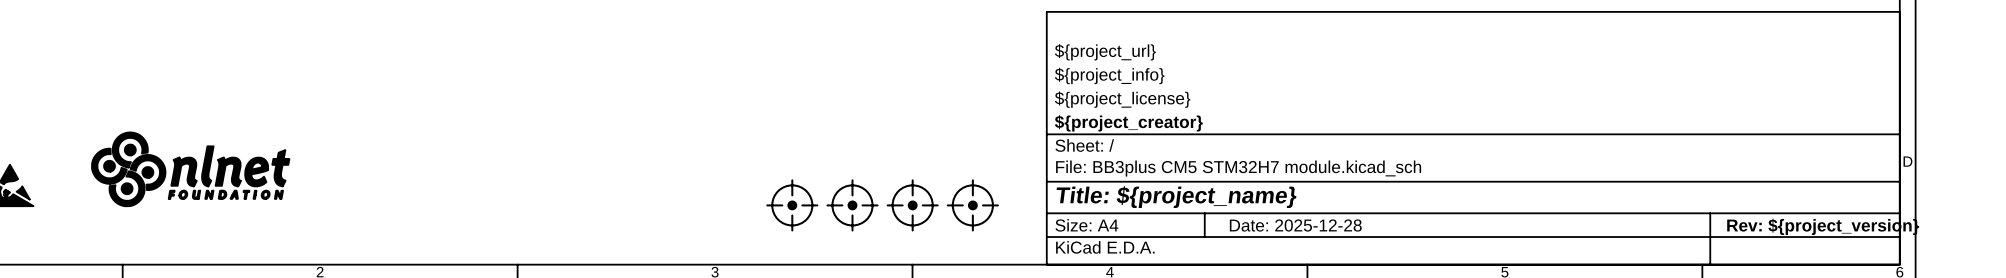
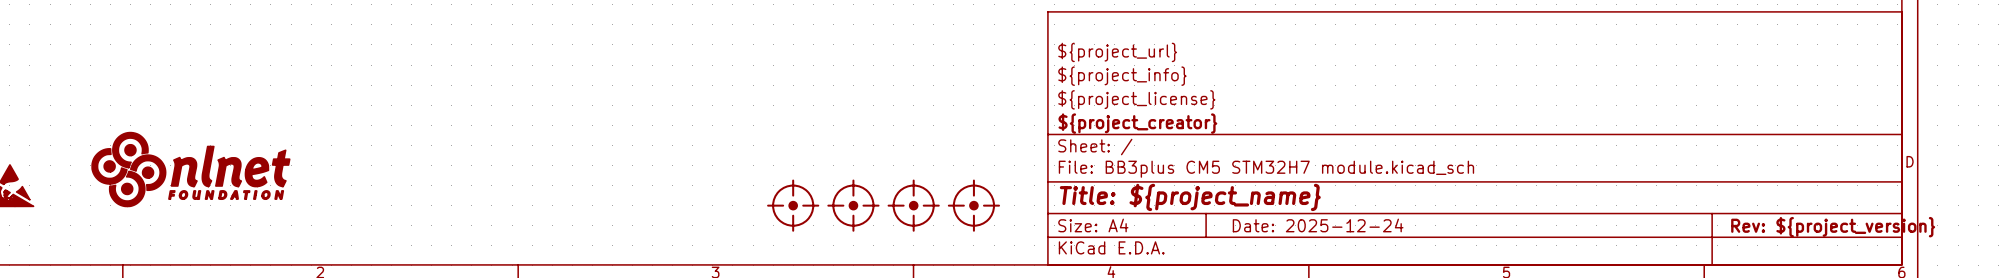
title block: Date: 2025-12-28 (1295, 225) -> Date: 2025-12-24 (1318, 225)

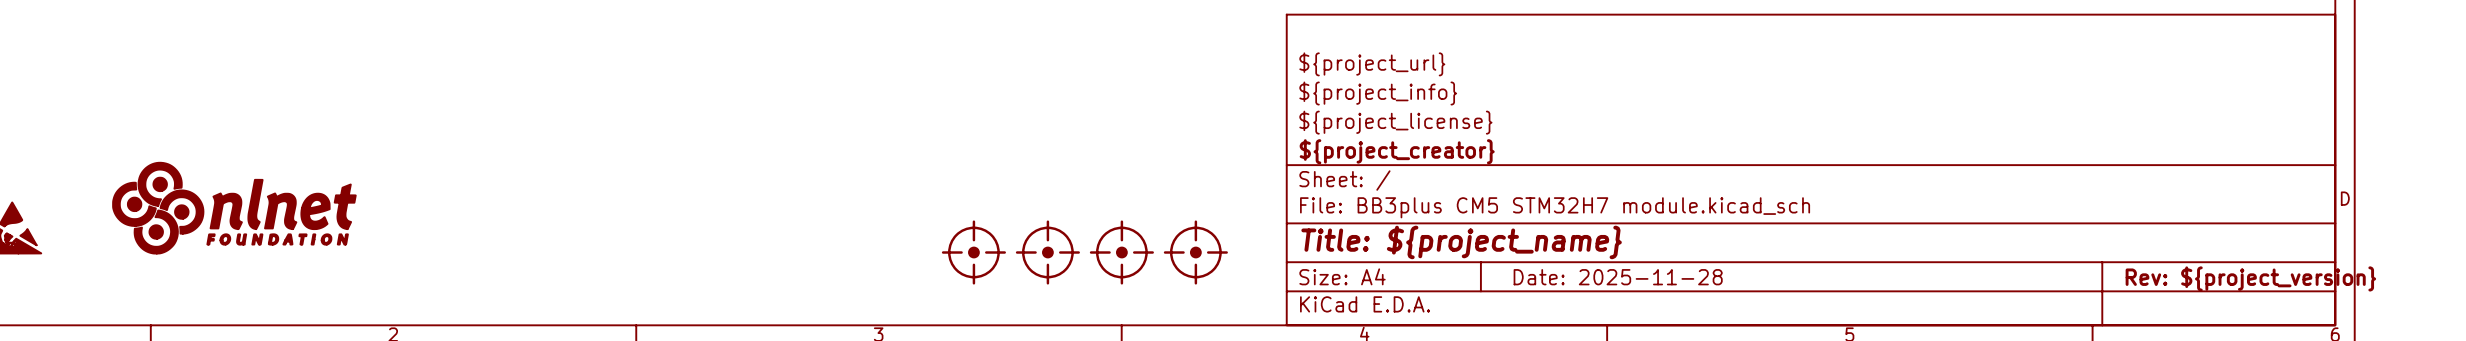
title block: Date: 2025-12-24 (1318, 225) -> Date: 2025-11-28 (1618, 277)

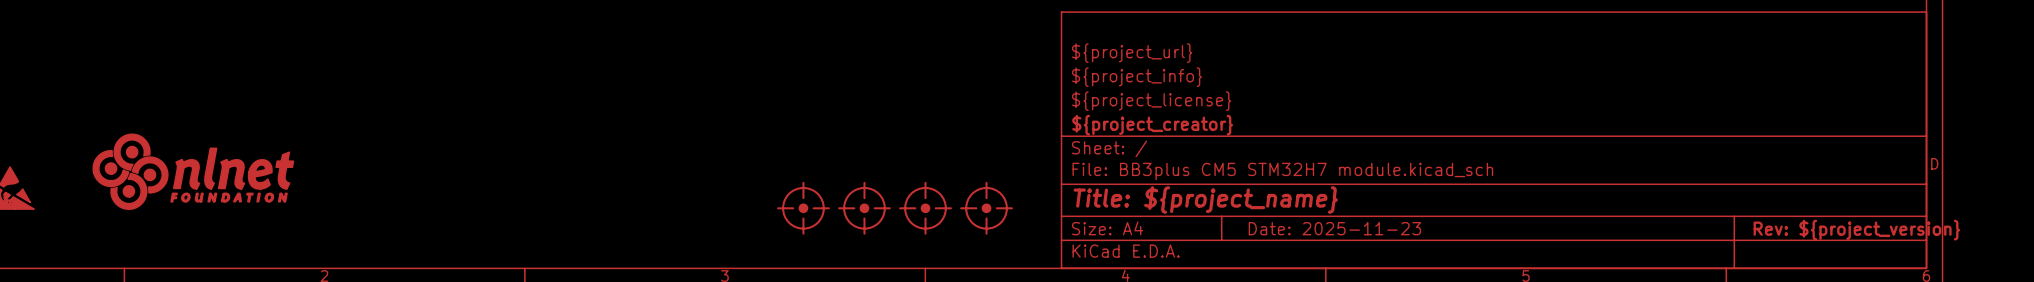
title block: Date: 2025-11-28 (1618, 277) -> Date: 2025-11-23 (1334, 228)

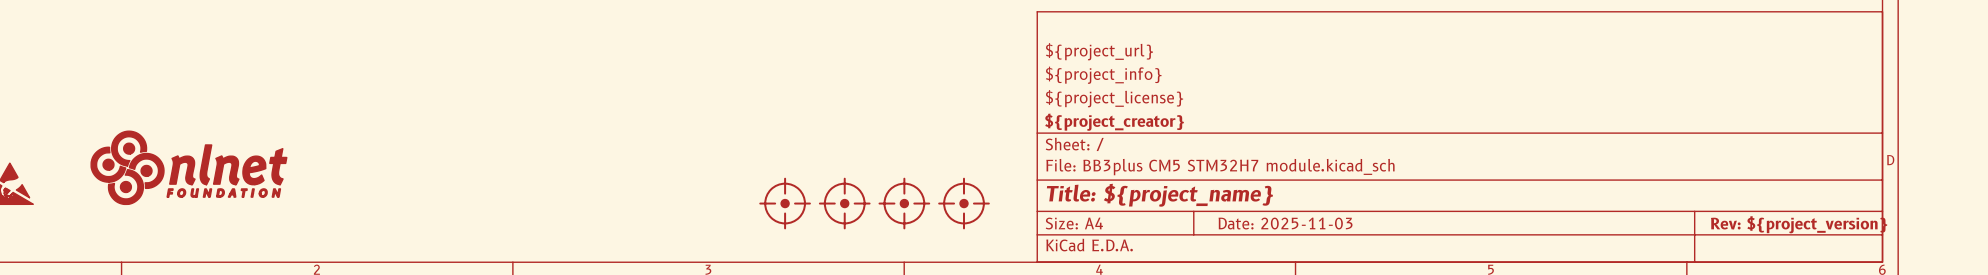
title block: Date: 2025-11-23 (1334, 228) -> Date: 2025-11-03 (1285, 223)

